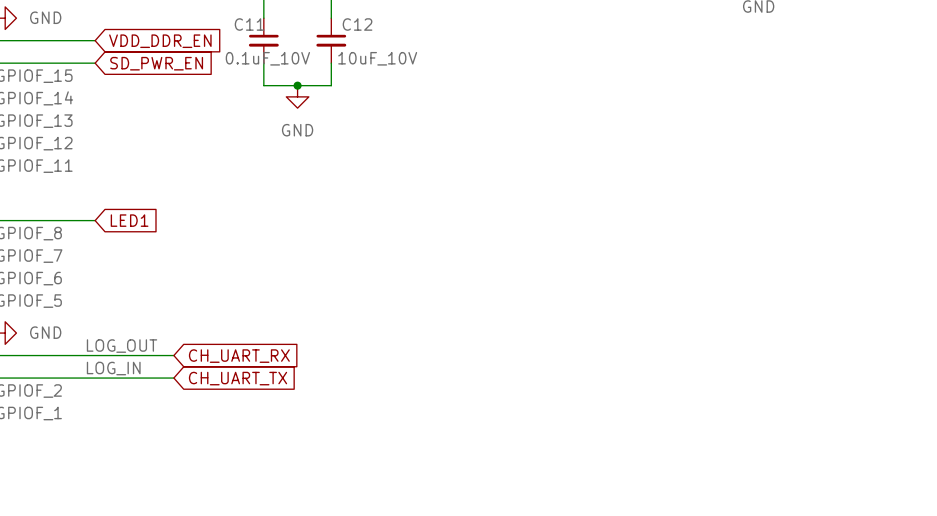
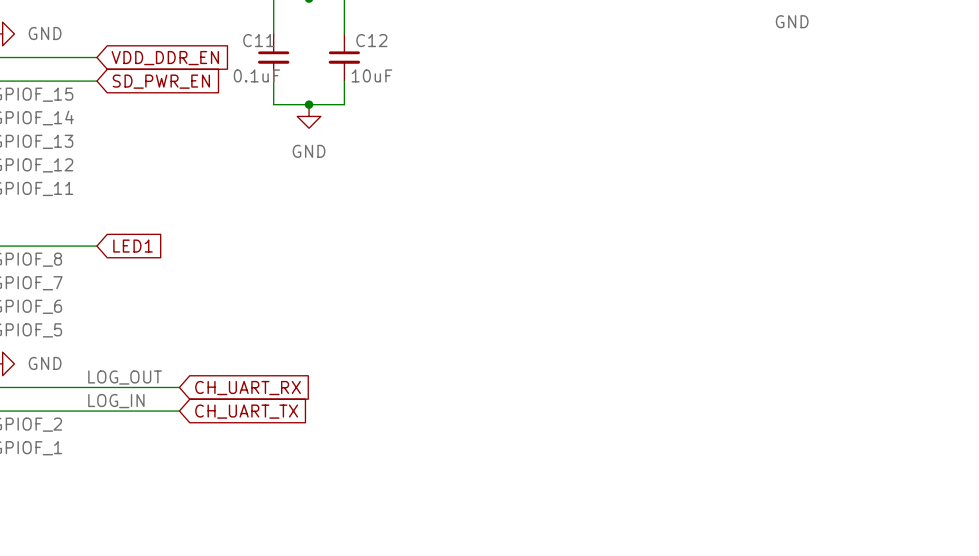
C11 value: 0.1uF_10V (267, 58) -> 0.1uF (256, 75)
C12 value: 10uF_10V (377, 58) -> 10uF (371, 75)

